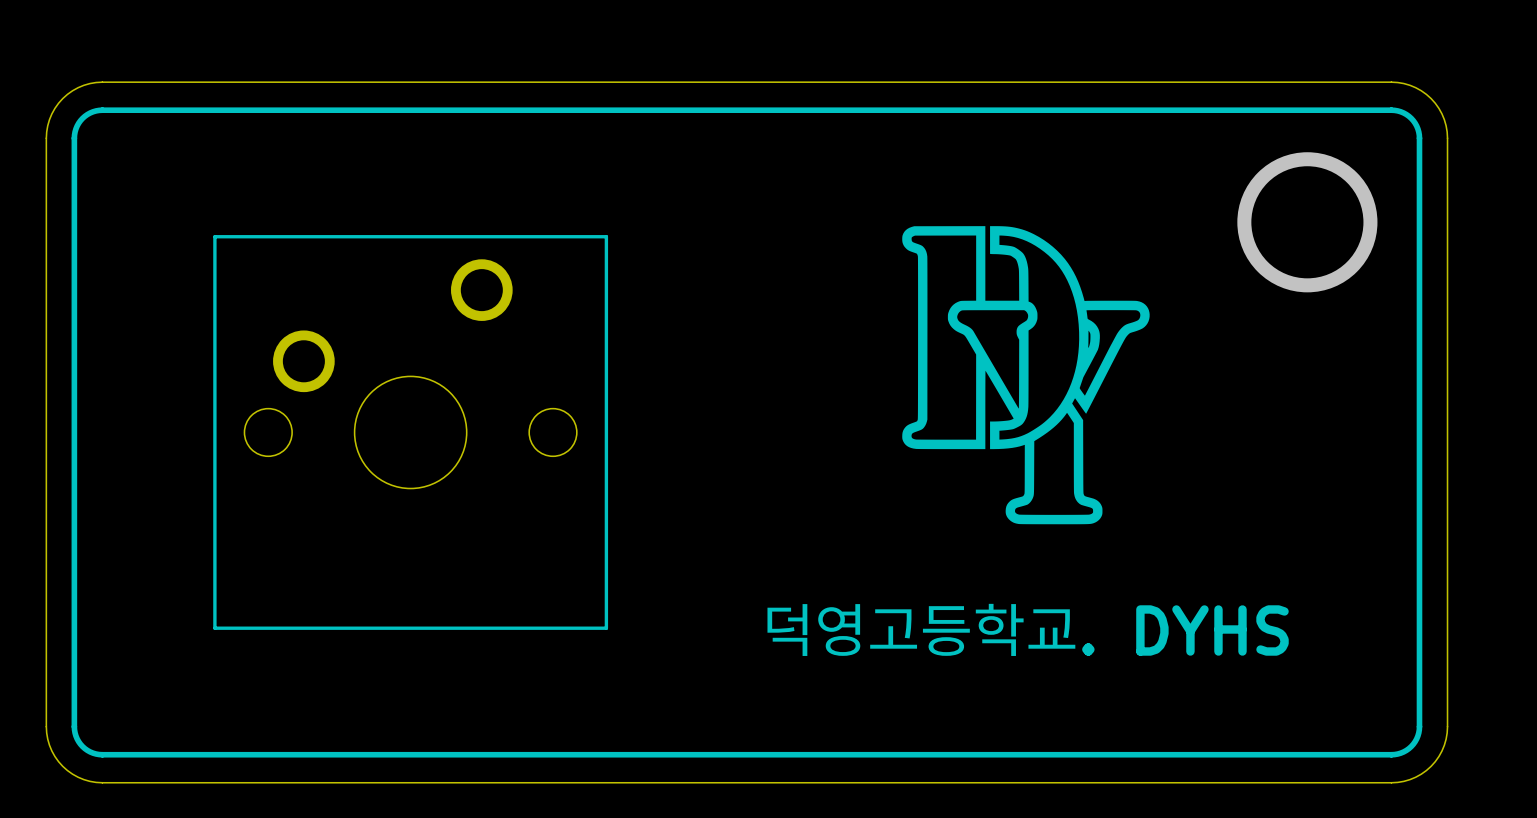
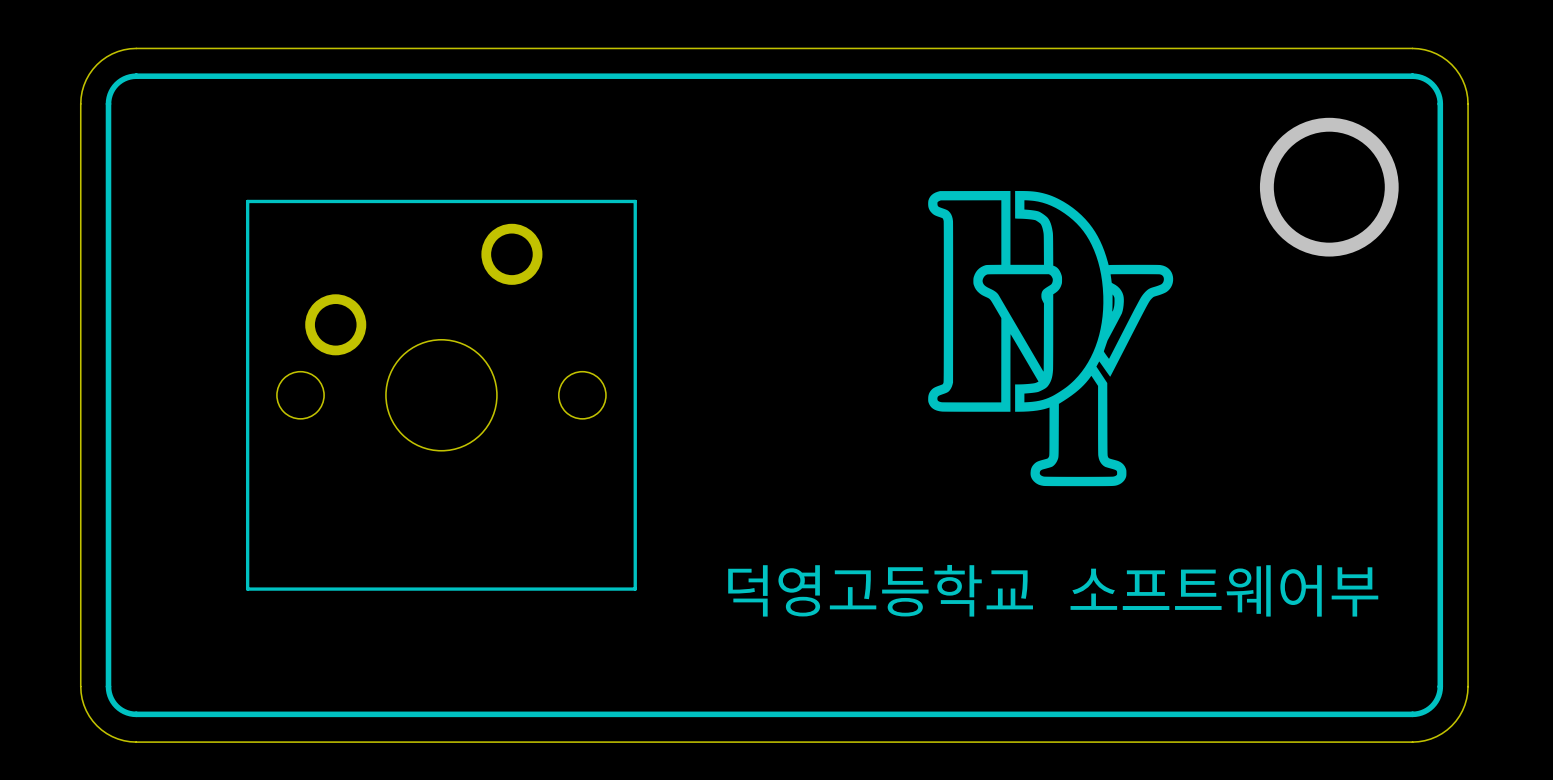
text: 덕영고등학교. DYHS (1026, 629) -> 덕영고등학교 소프트웨어부 (1053, 590)

